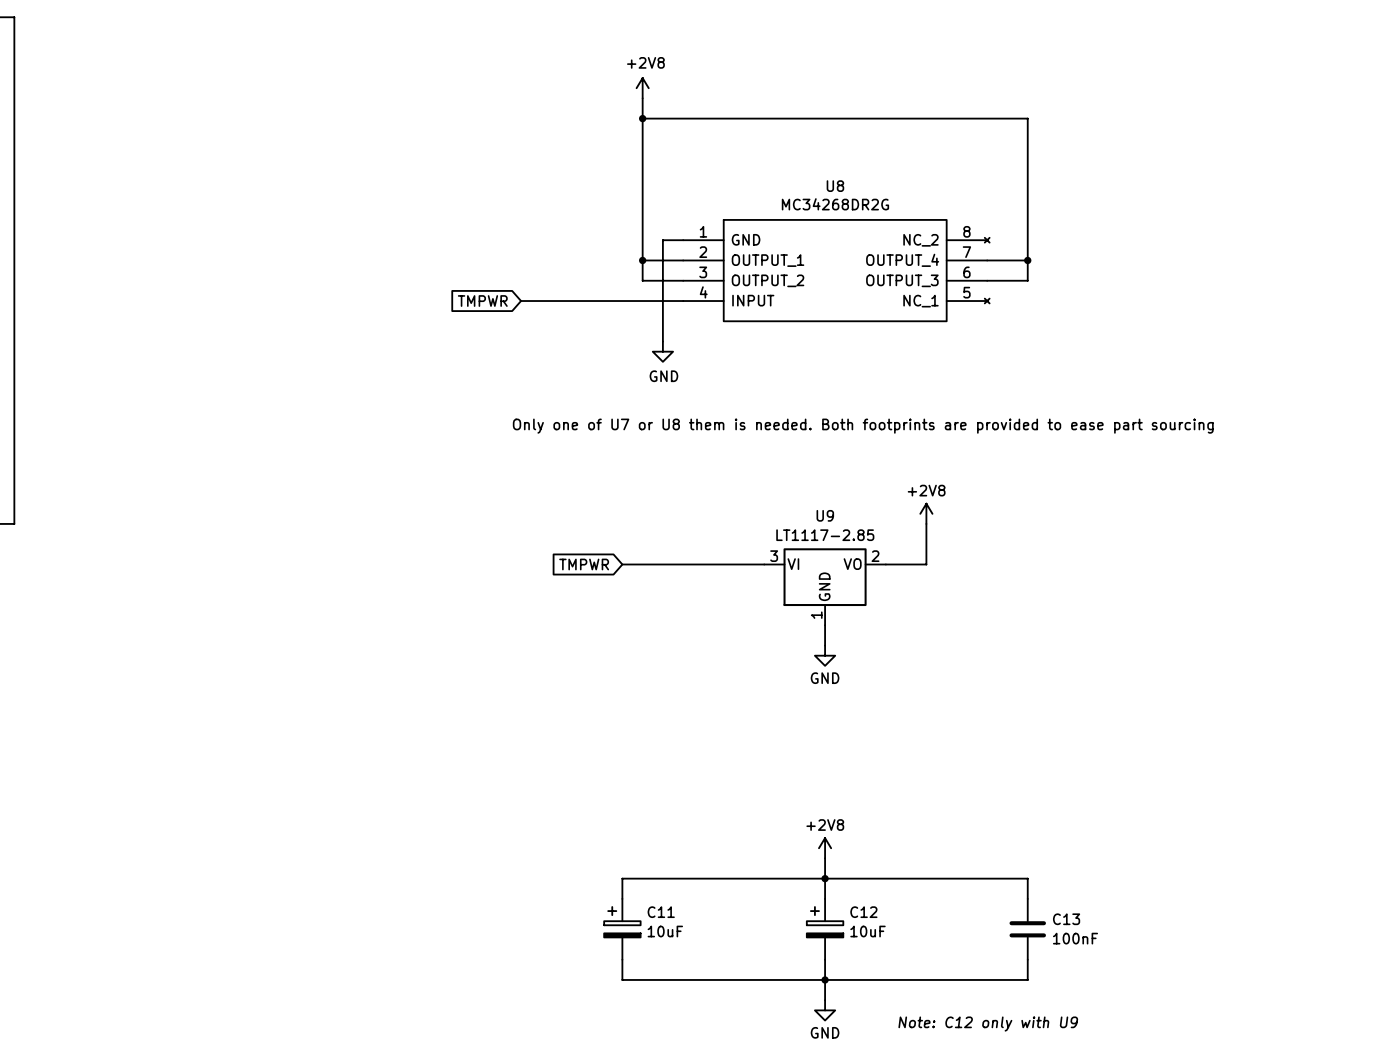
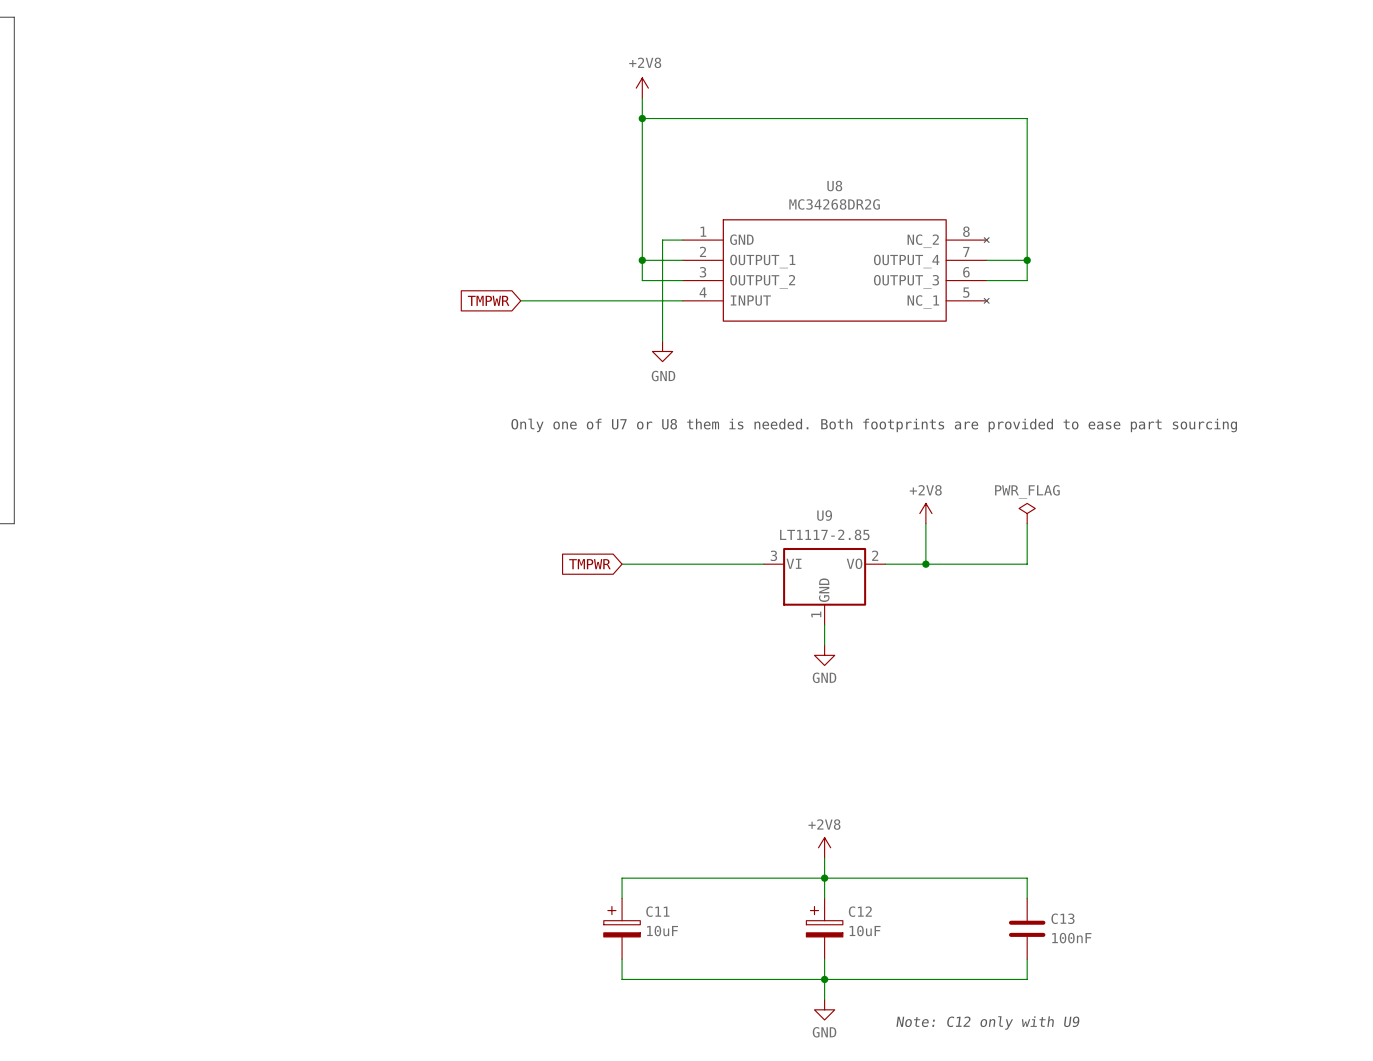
power symbol: none -> PWR_FLAG (1027, 513)
wire: none -> (1027, 523) (1027, 564) (925, 564)
junction: none -> (925, 564)

